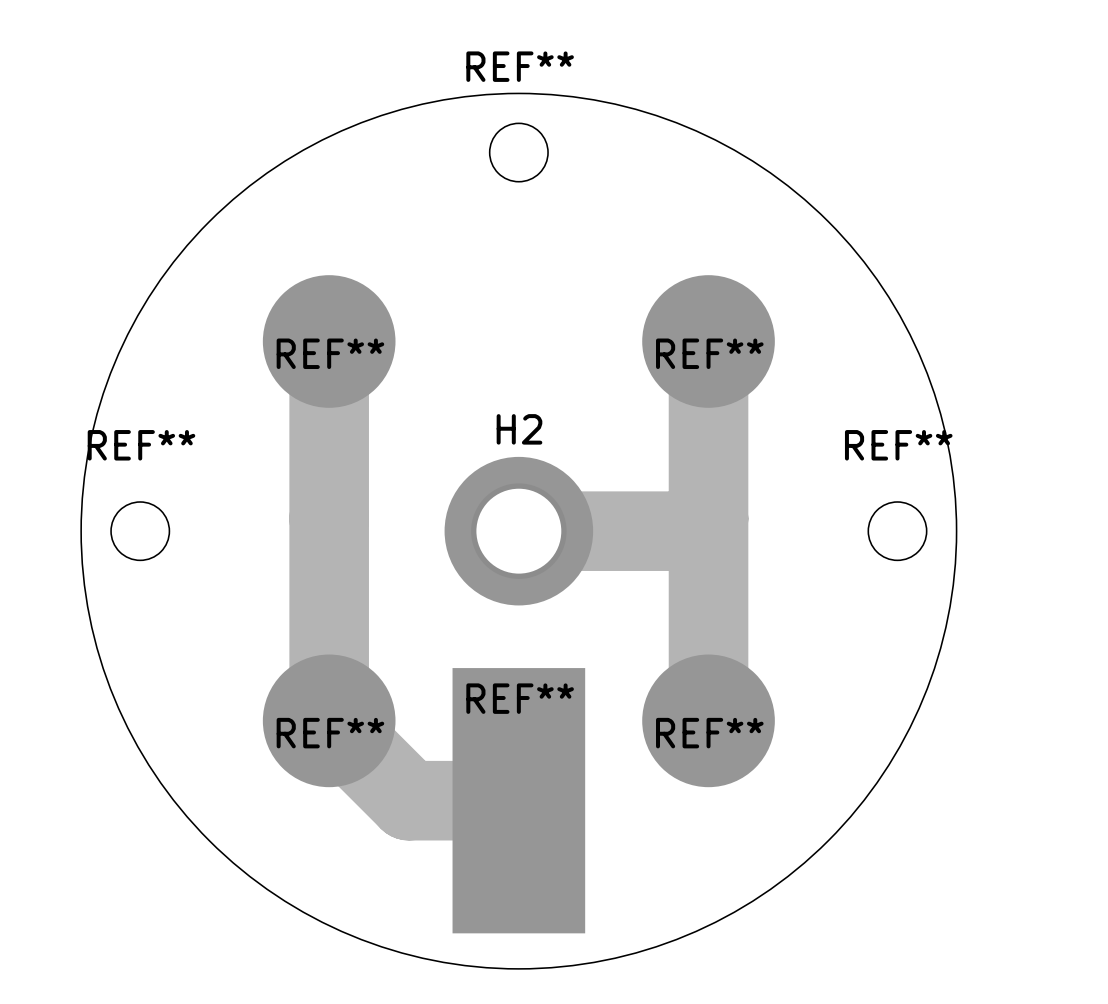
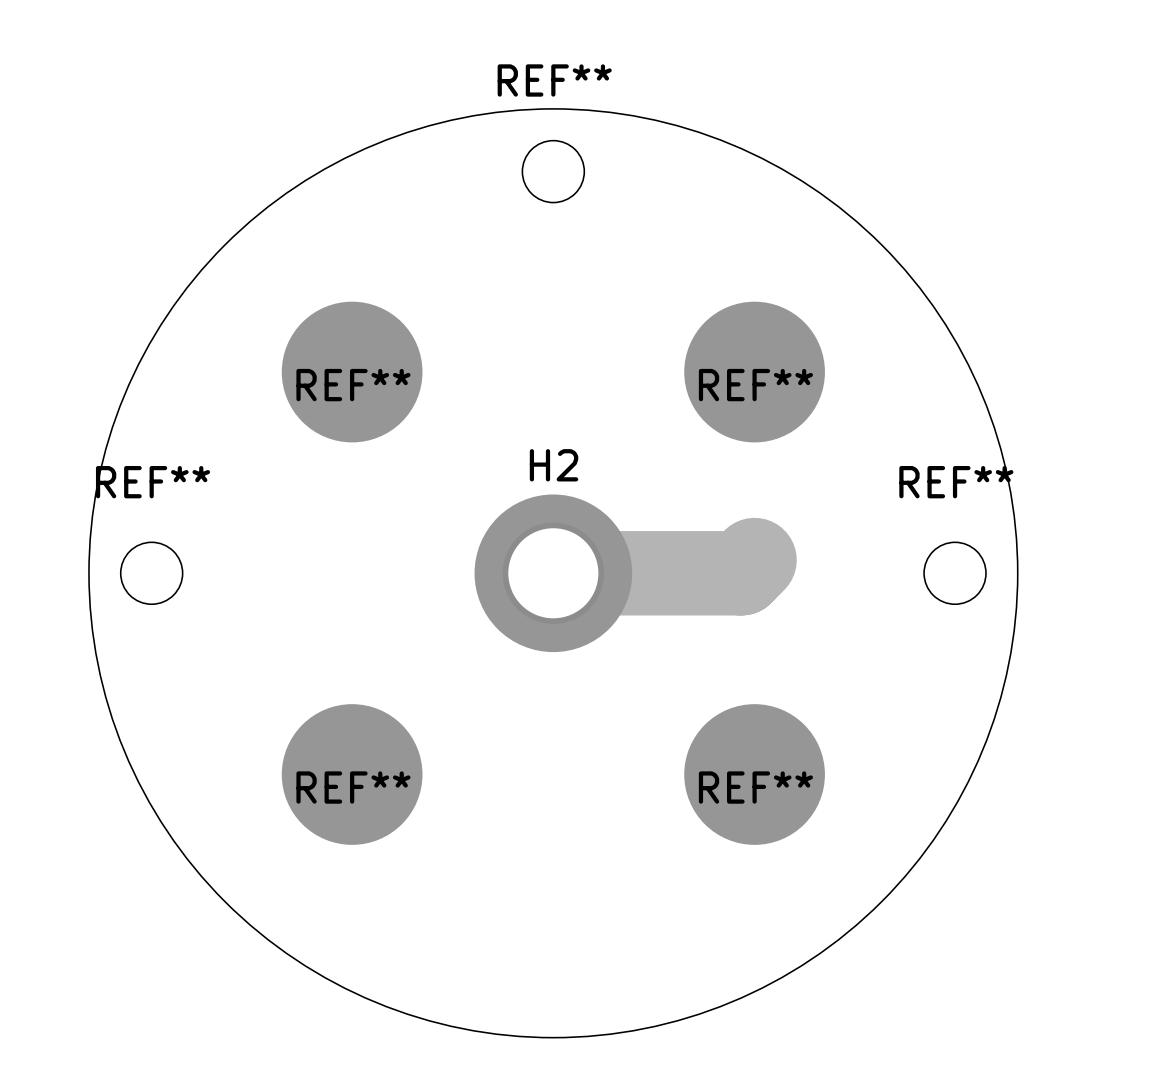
track: (329, 341) (329, 720) (409, 800) (518, 800) -> none
track: (708, 341) (708, 720) -> none
REF**: (518, 800) -> none

